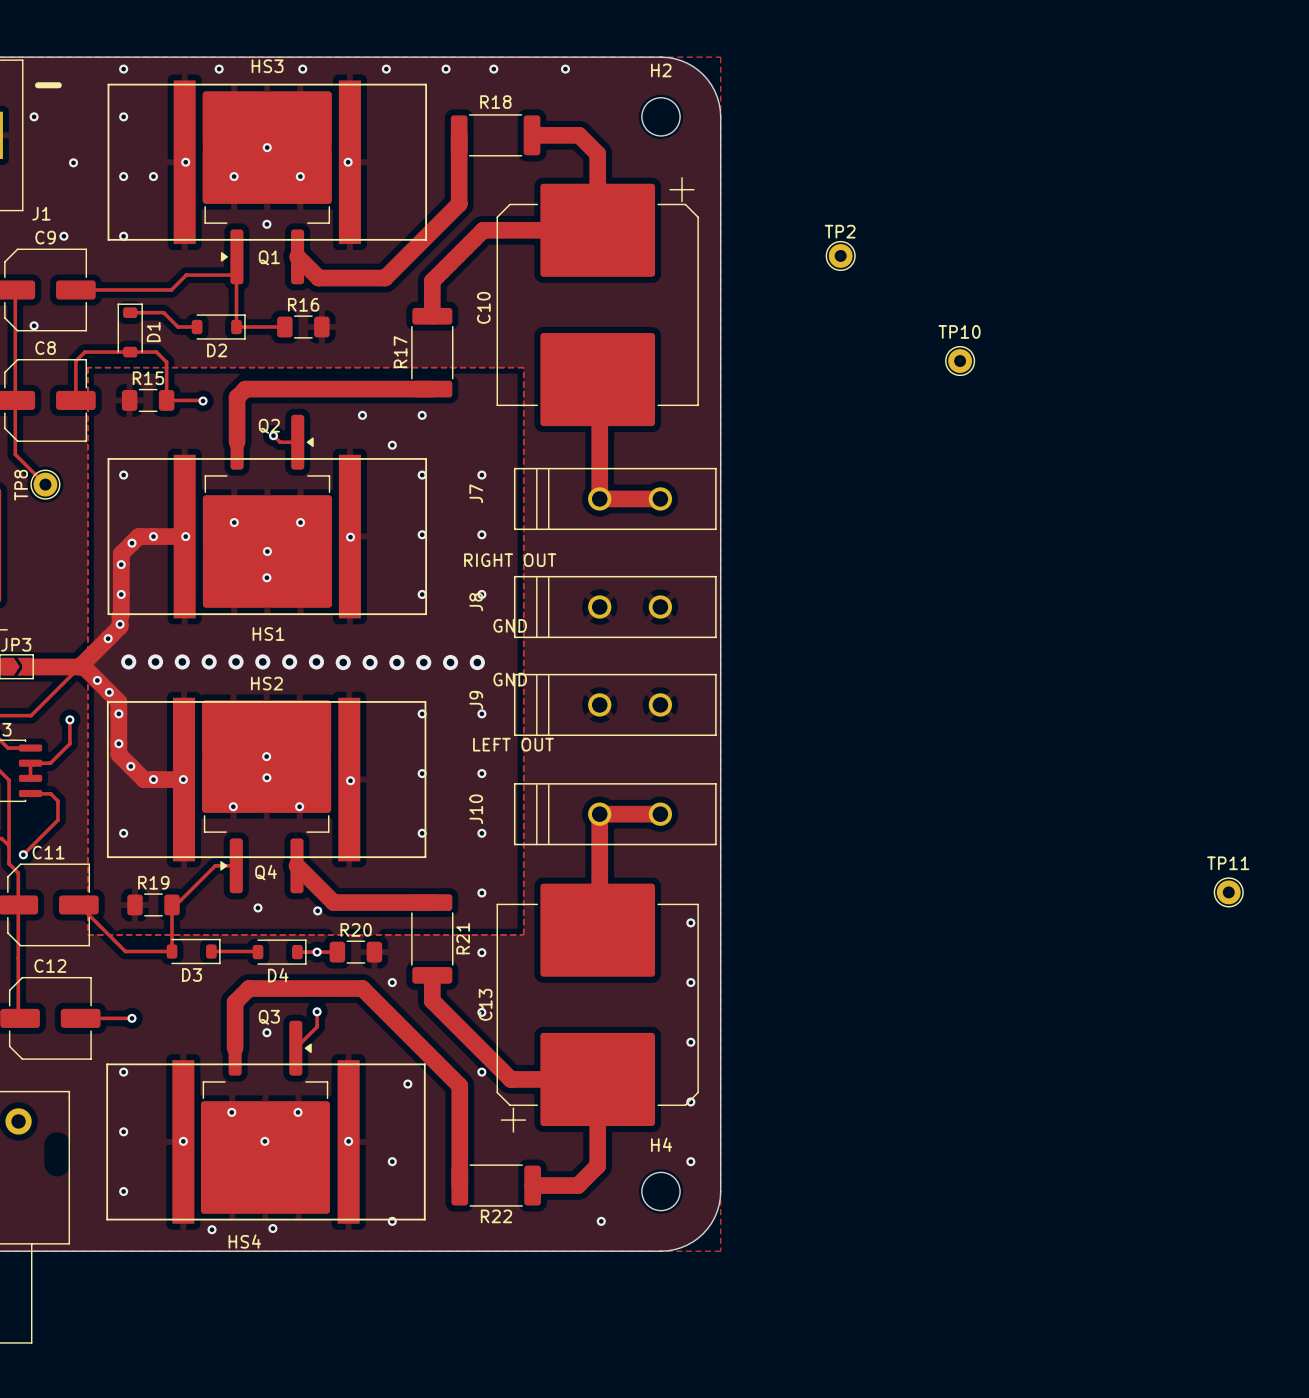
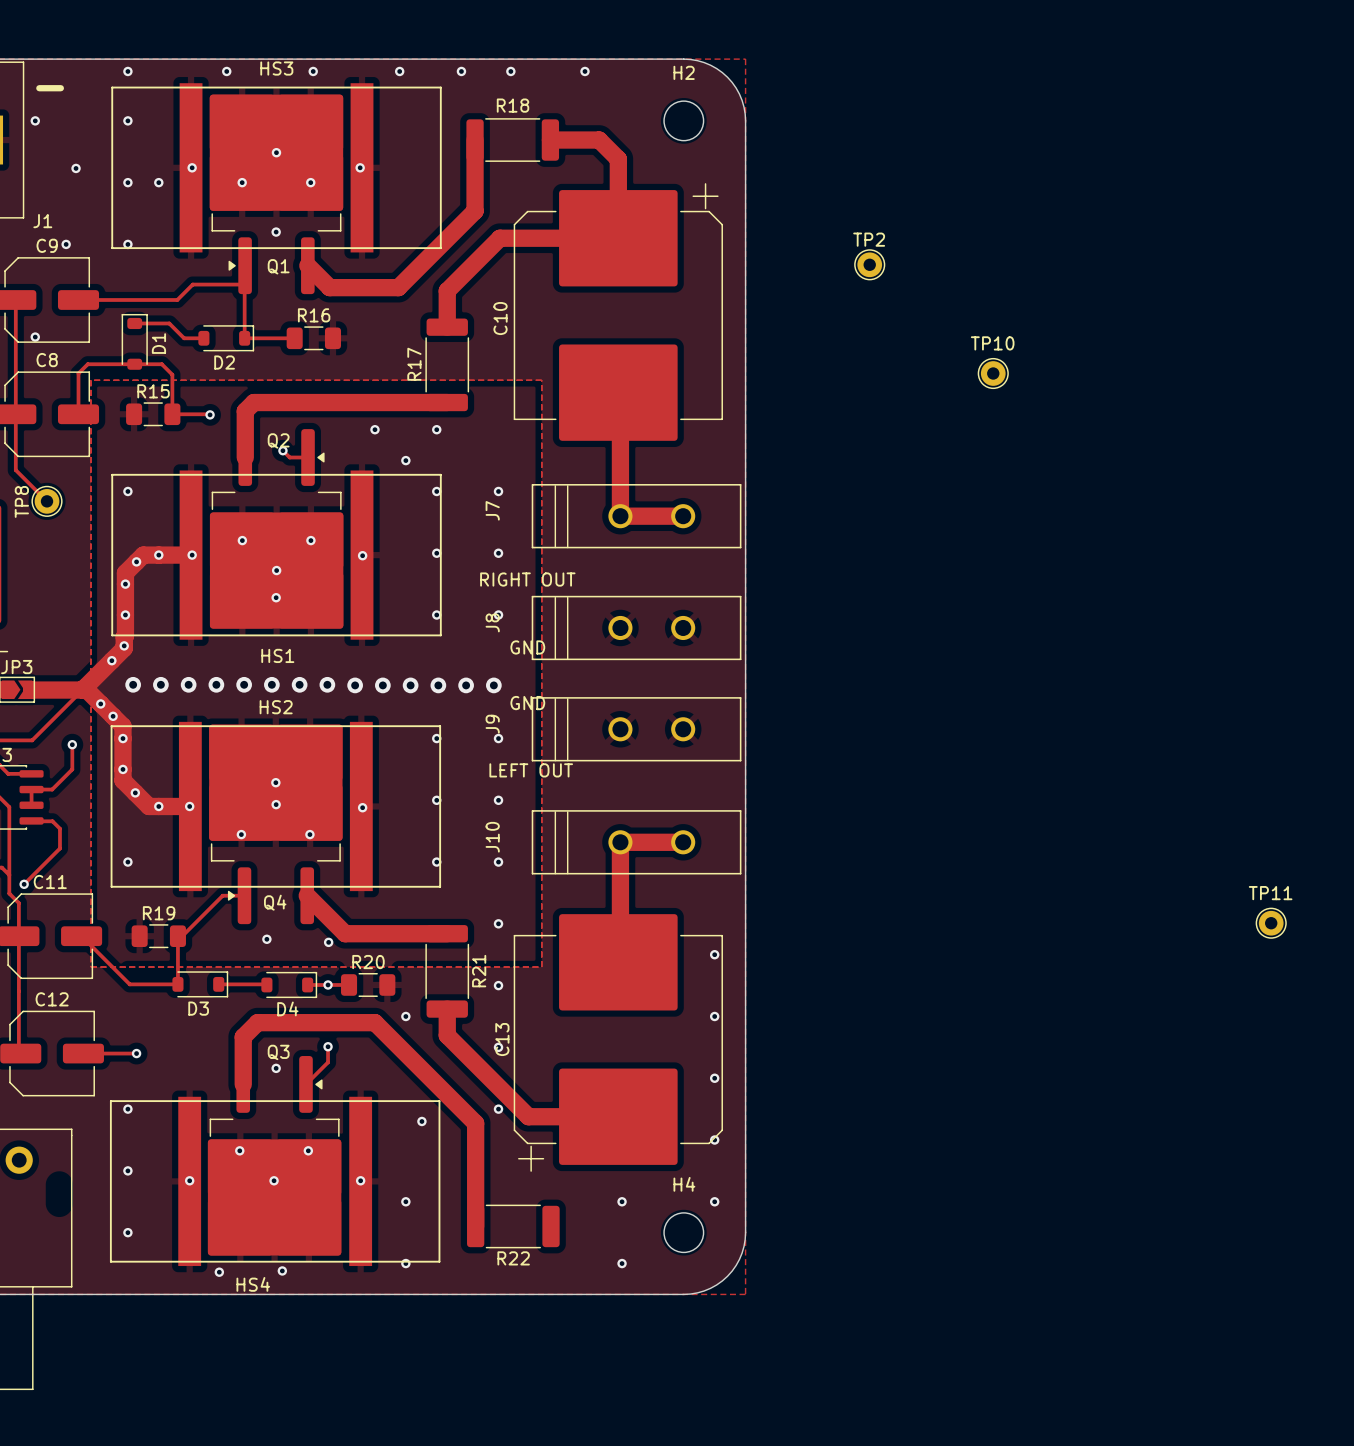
track: (597, 1079) (597, 1165) (577, 1185) (532, 1185) -> none
via: none -> (622, 1201)

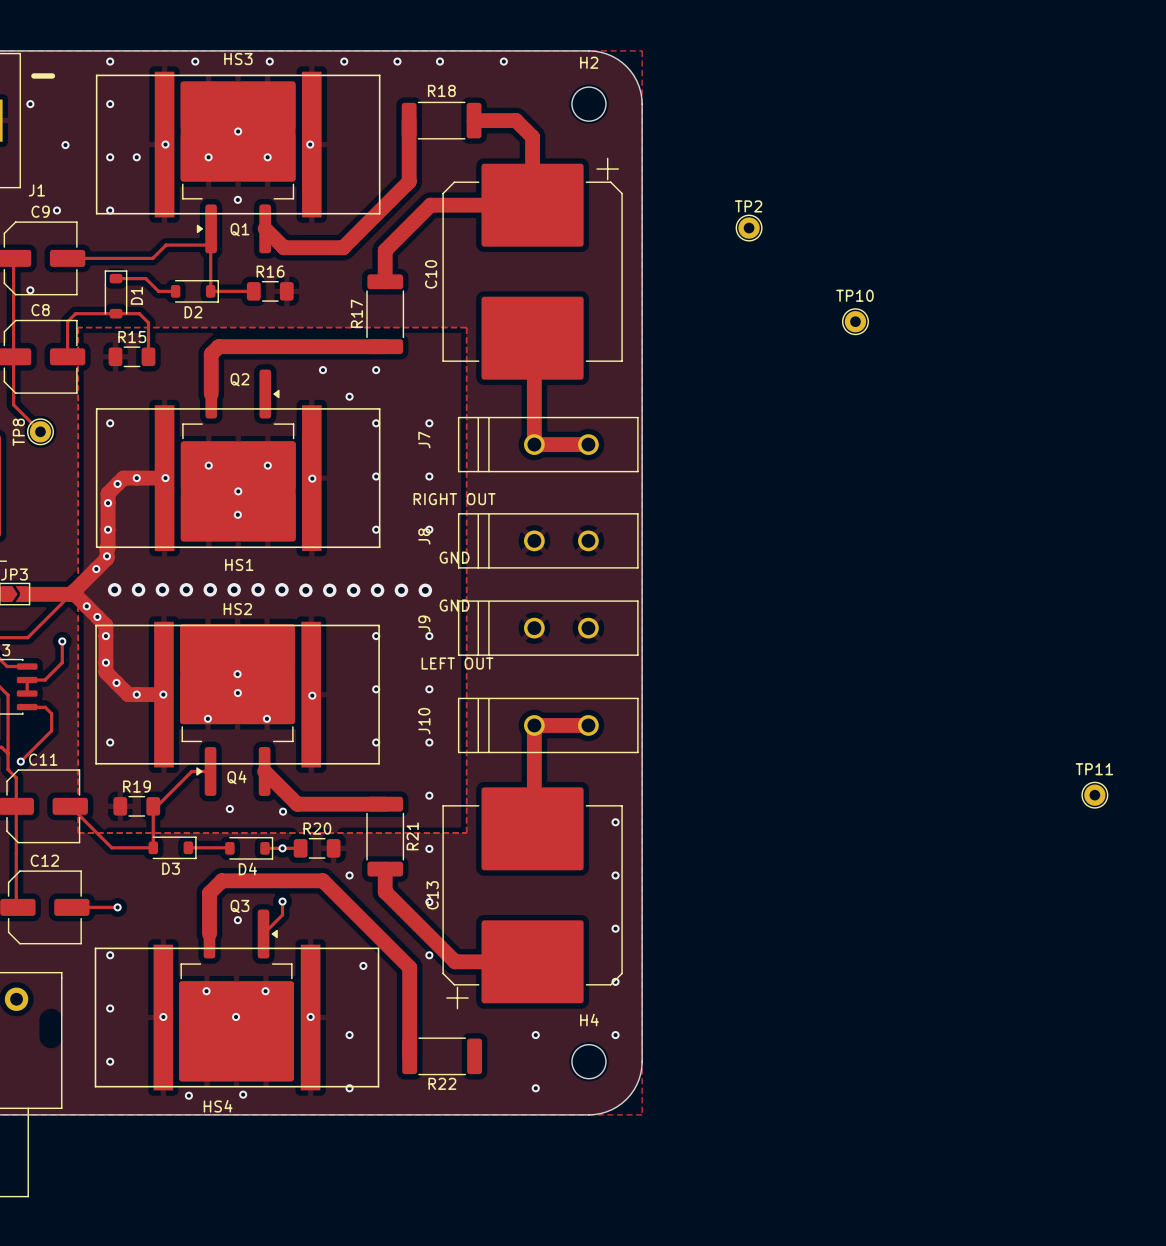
track: (172, 414) (210, 414) -> none
via: (210, 414) -> none
track: (282, 450) (289, 457) (308, 457) -> none
via: (282, 450) -> none

